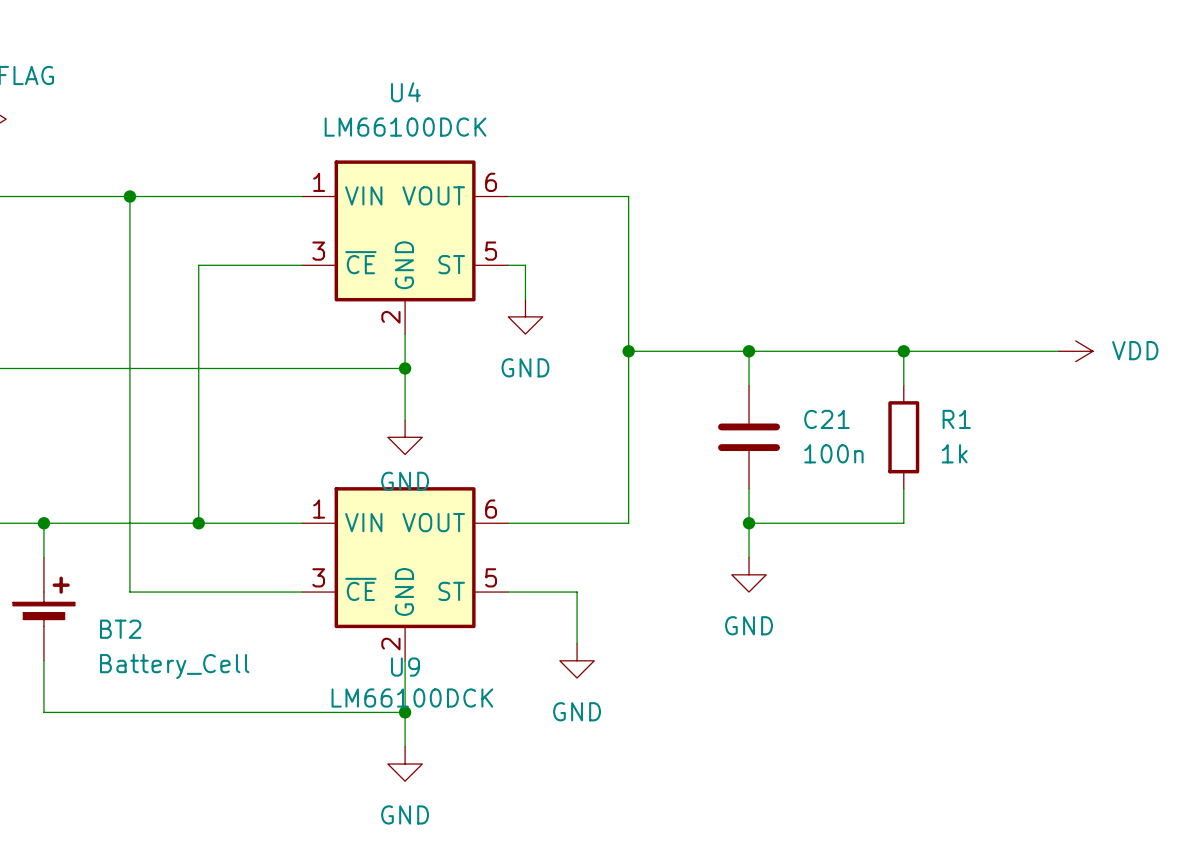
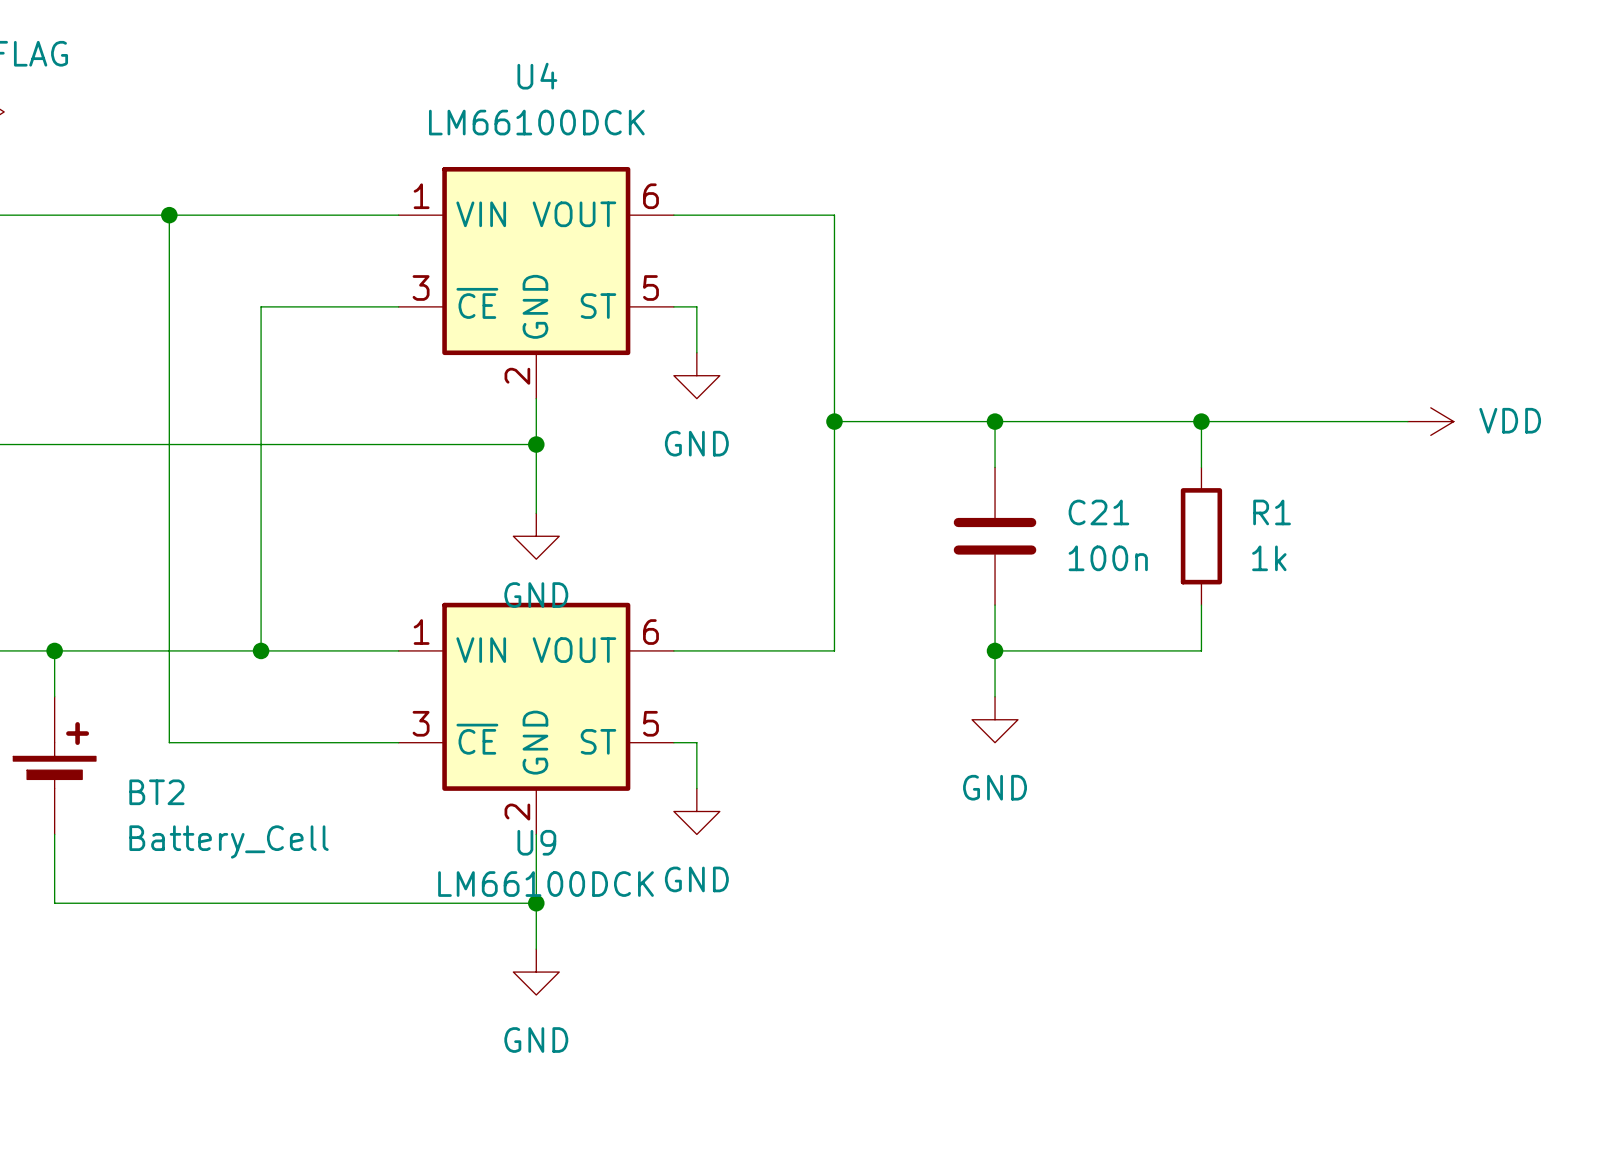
wire: (525, 592) (577, 592) (577, 643) -> (696, 742) (696, 788)
power symbol position: GND (577, 660) -> GND (696, 811)

